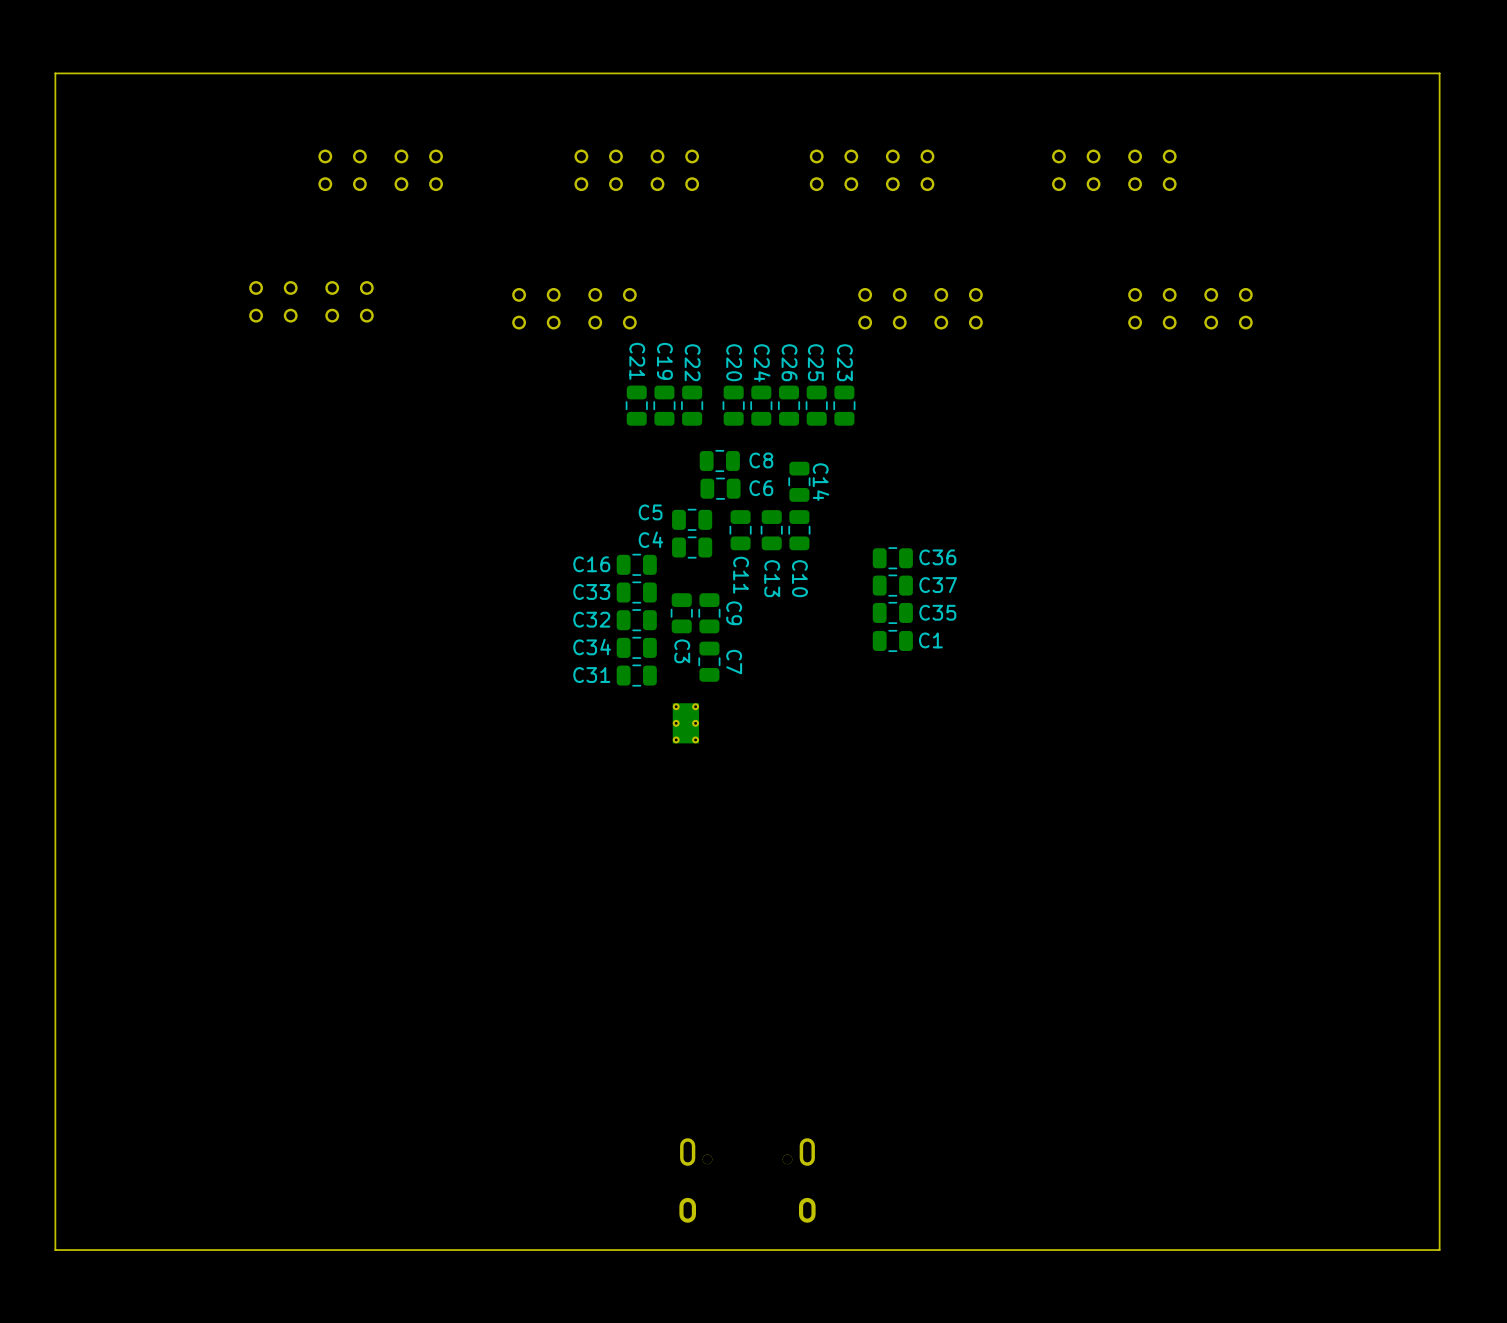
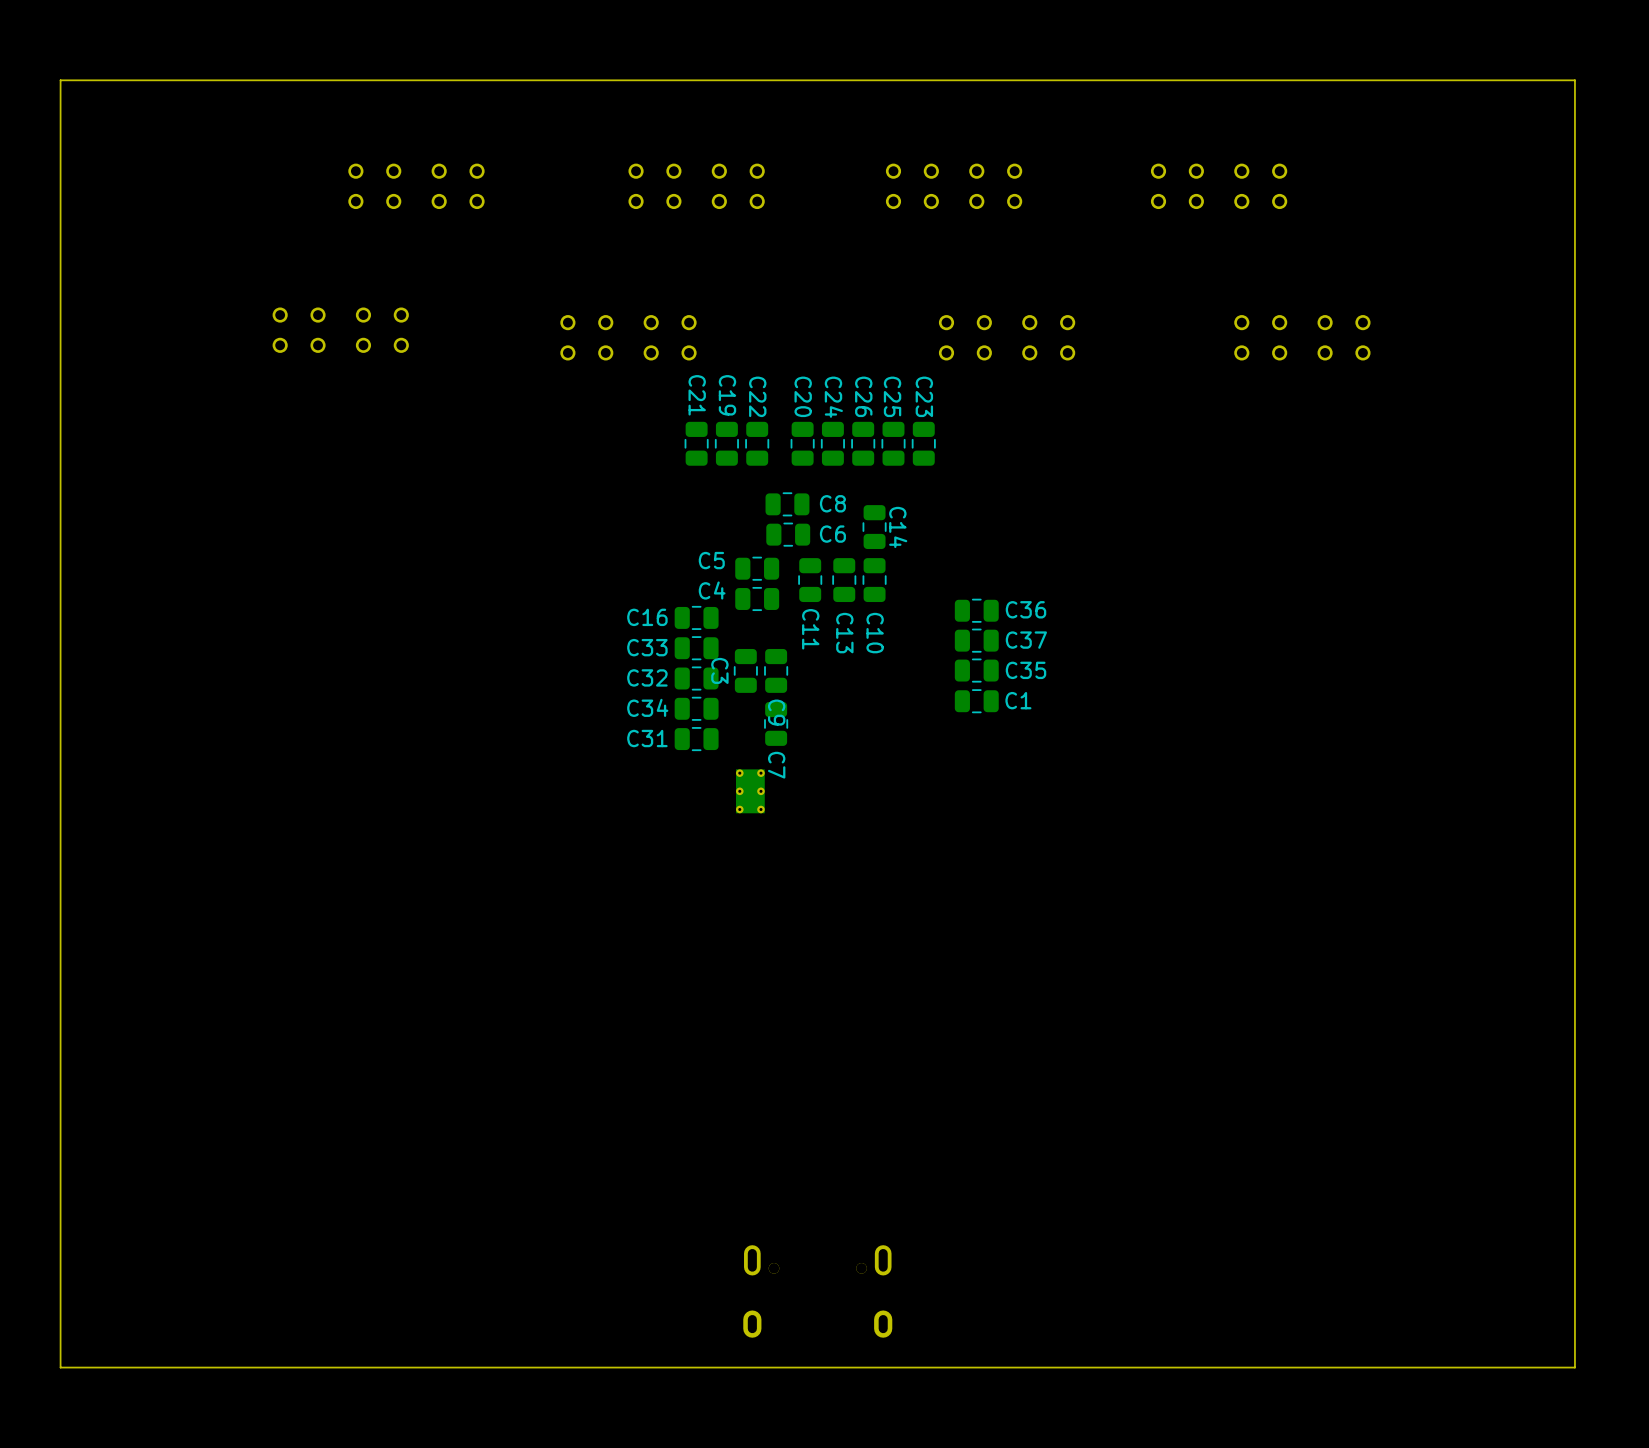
C9 name position: C9 (734, 613) -> C9 (776, 712)
C3 name position: C3 (682, 651) -> C3 (719, 670)
C7 name position: C7 (734, 662) -> C7 (776, 765)

